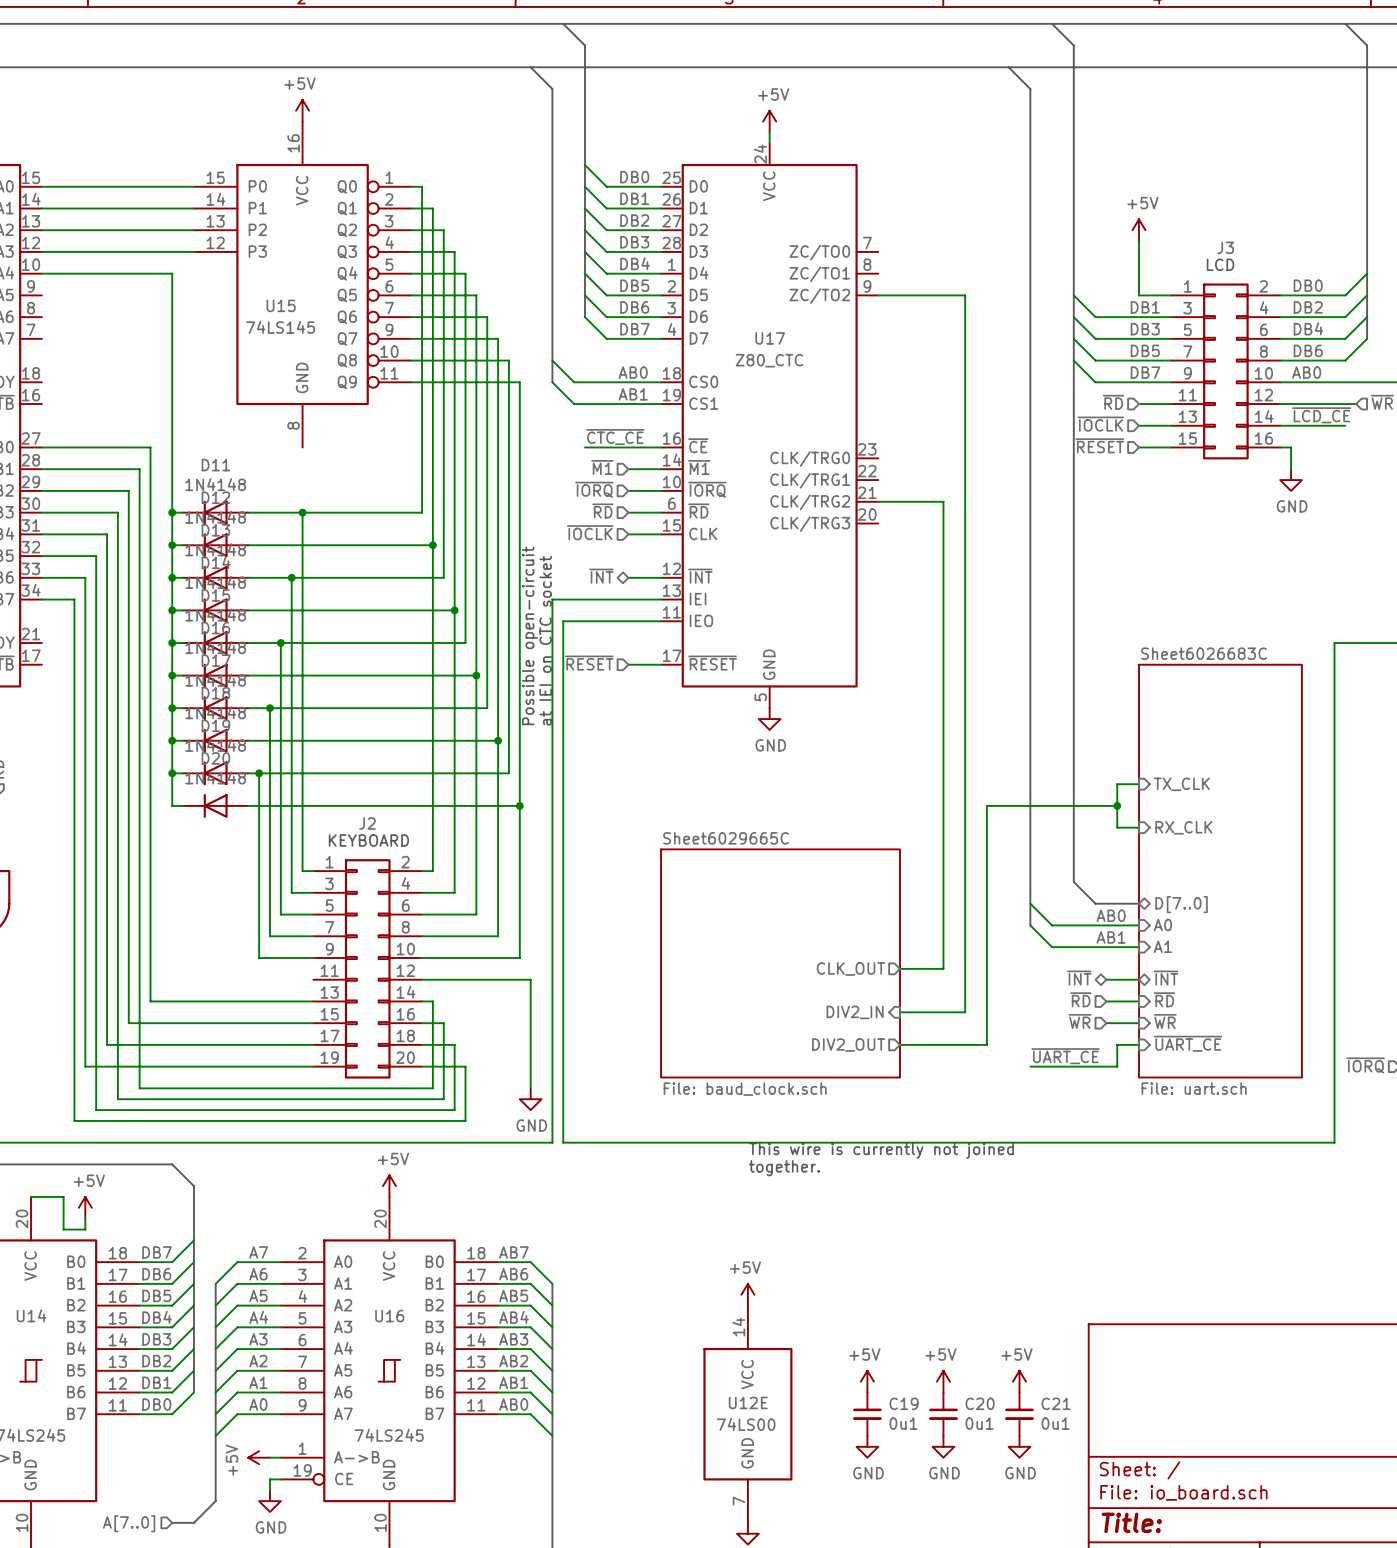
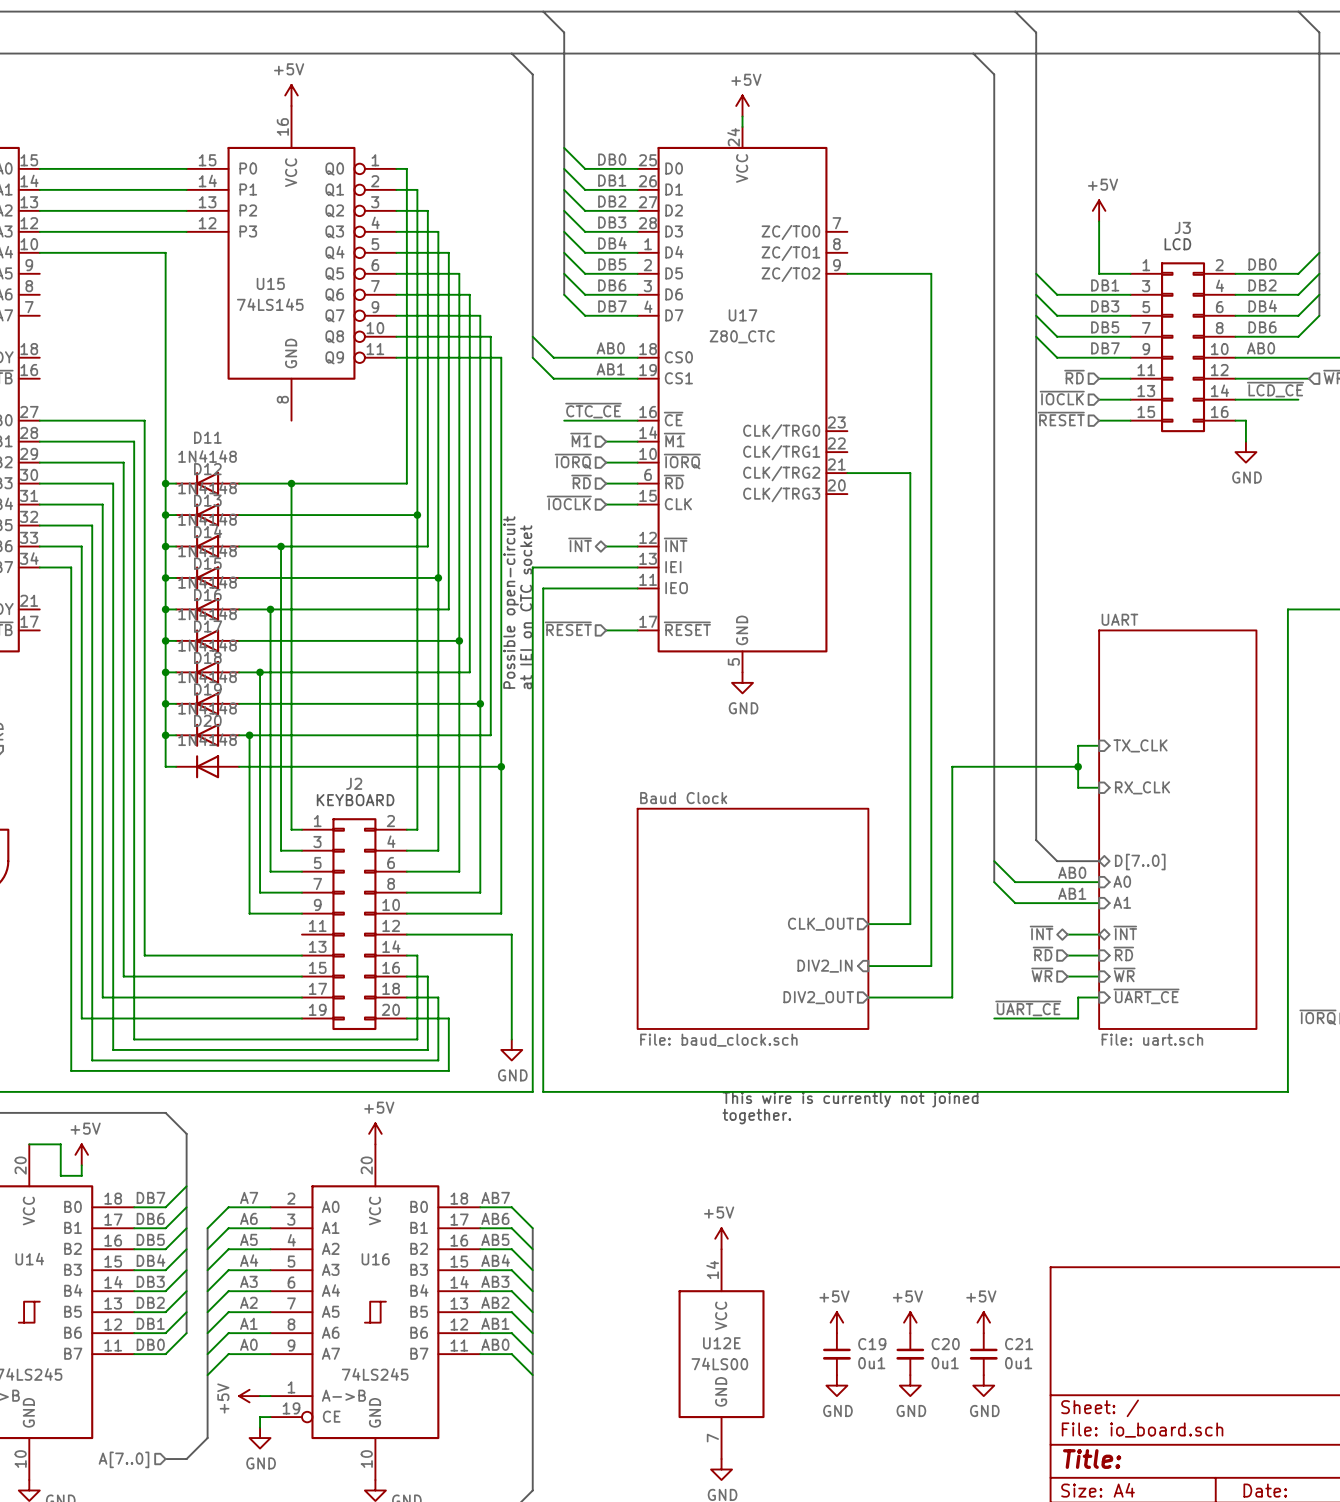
sheet Sheet6026683C name: Sheet6026683C (1203, 653) -> UART (1119, 619)
sheet Sheet6029665C name: Sheet6029665C (726, 838) -> Baud Clock (683, 798)

